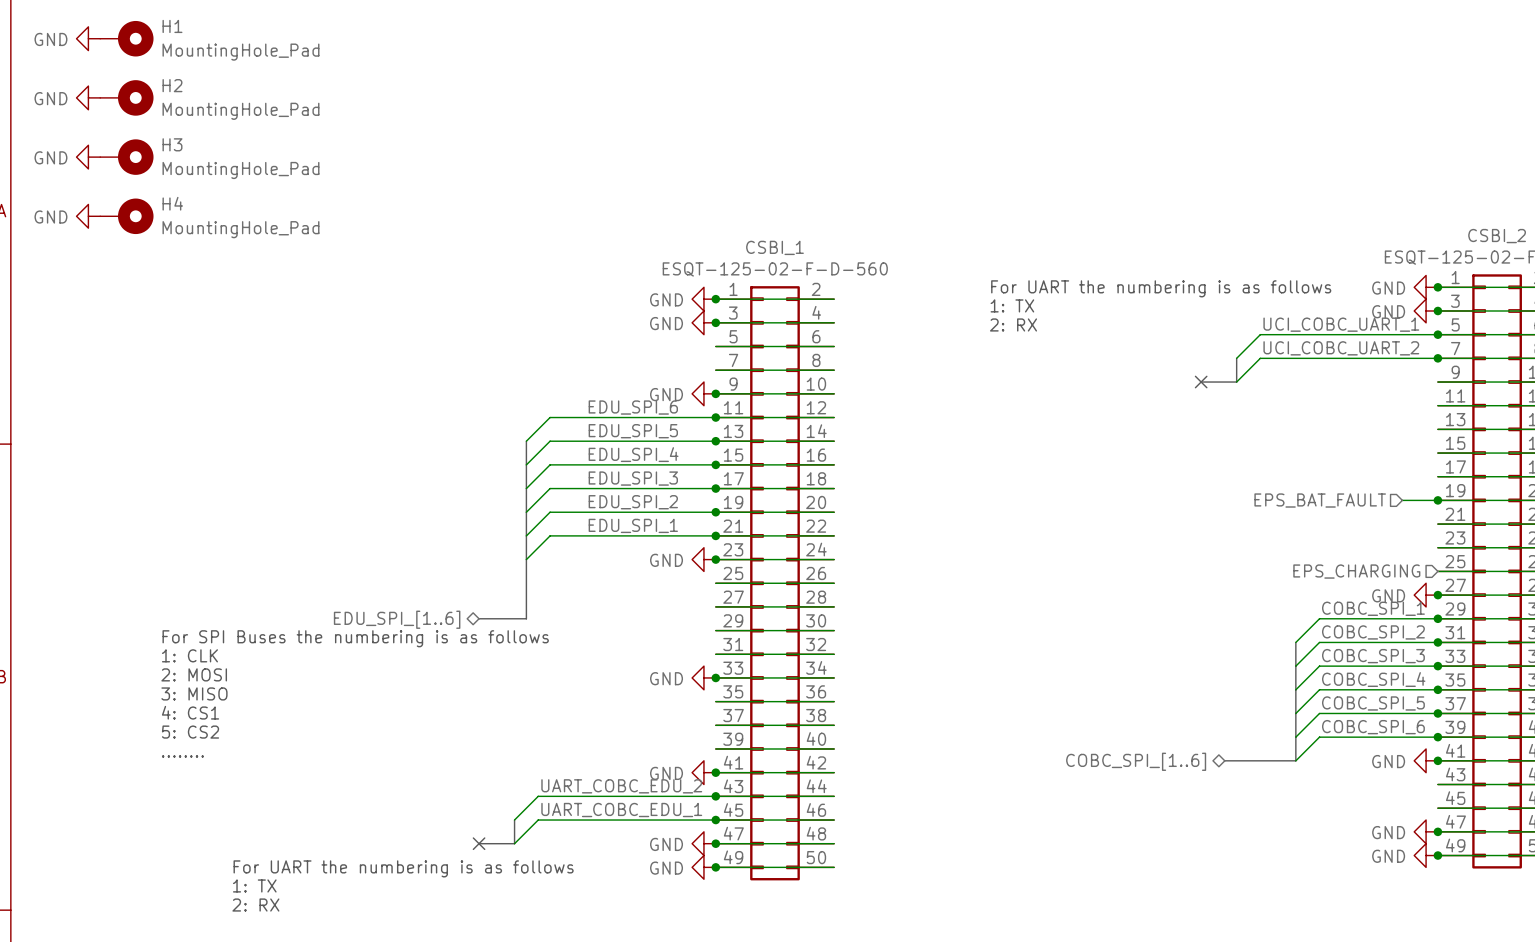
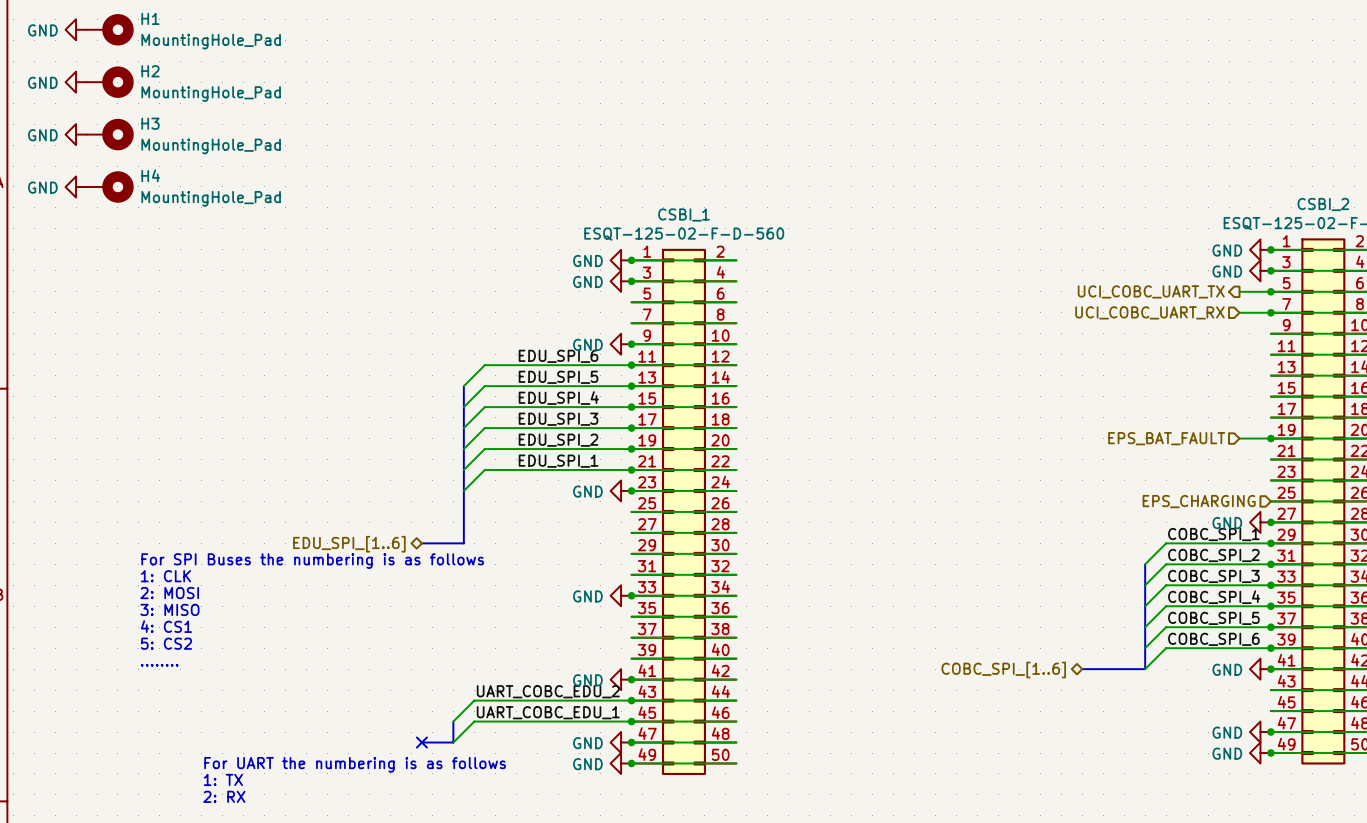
text: For UART the numbering is as follows (1161, 288) -> none
text: 1: TX (1012, 305) -> none
text: 2: RX (1013, 324) -> none
label: UCI_COBC_UART_1 (1341, 324) -> none
hierarchical label: none -> UCI_COBC_UART_TX (1151, 291)
wire: (1402, 334) (1260, 334) (1236, 358) -> none
label: UCI_COBC_UART_2 (1341, 348) -> none
bus: (1236, 358) (1236, 382) (1201, 382) -> none
hierarchical label: none -> UCI_COBC_UART_RX (1149, 312)
wire: (1402, 358) (1260, 358) (1236, 382) -> none
no-connect mark: (1201, 382) -> none

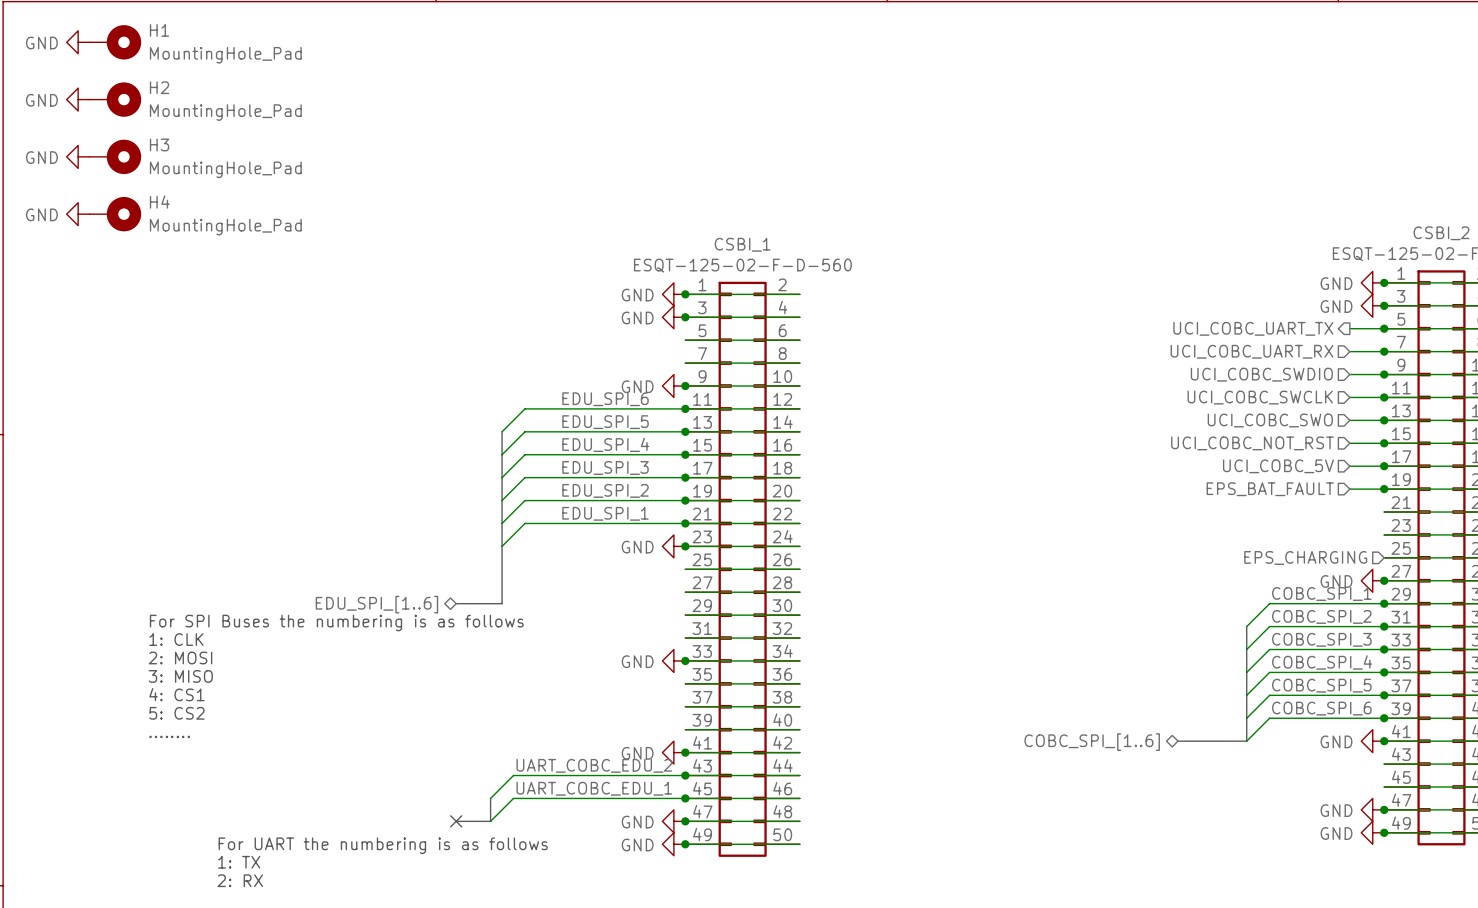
hierarchical label: none -> UCI_COBC_SWDIO (1261, 374)
wire: none -> (1349, 374) (1384, 374)
junction: none -> (1384, 374)
hierarchical label: none -> UCI_COBC_SWCLK (1260, 397)
wire: none -> (1349, 397) (1384, 397)
junction: none -> (1384, 397)
hierarchical label: none -> UCI_COBC_SWO (1270, 420)
wire: none -> (1349, 420) (1384, 420)
junction: none -> (1384, 420)
hierarchical label: none -> UCI_COBC_NOT_RST (1252, 443)
wire: none -> (1349, 443) (1384, 443)
junction: none -> (1384, 443)
hierarchical label: none -> UCI_COBC_5V (1278, 466)
wire: none -> (1349, 466) (1384, 466)
junction: none -> (1384, 466)

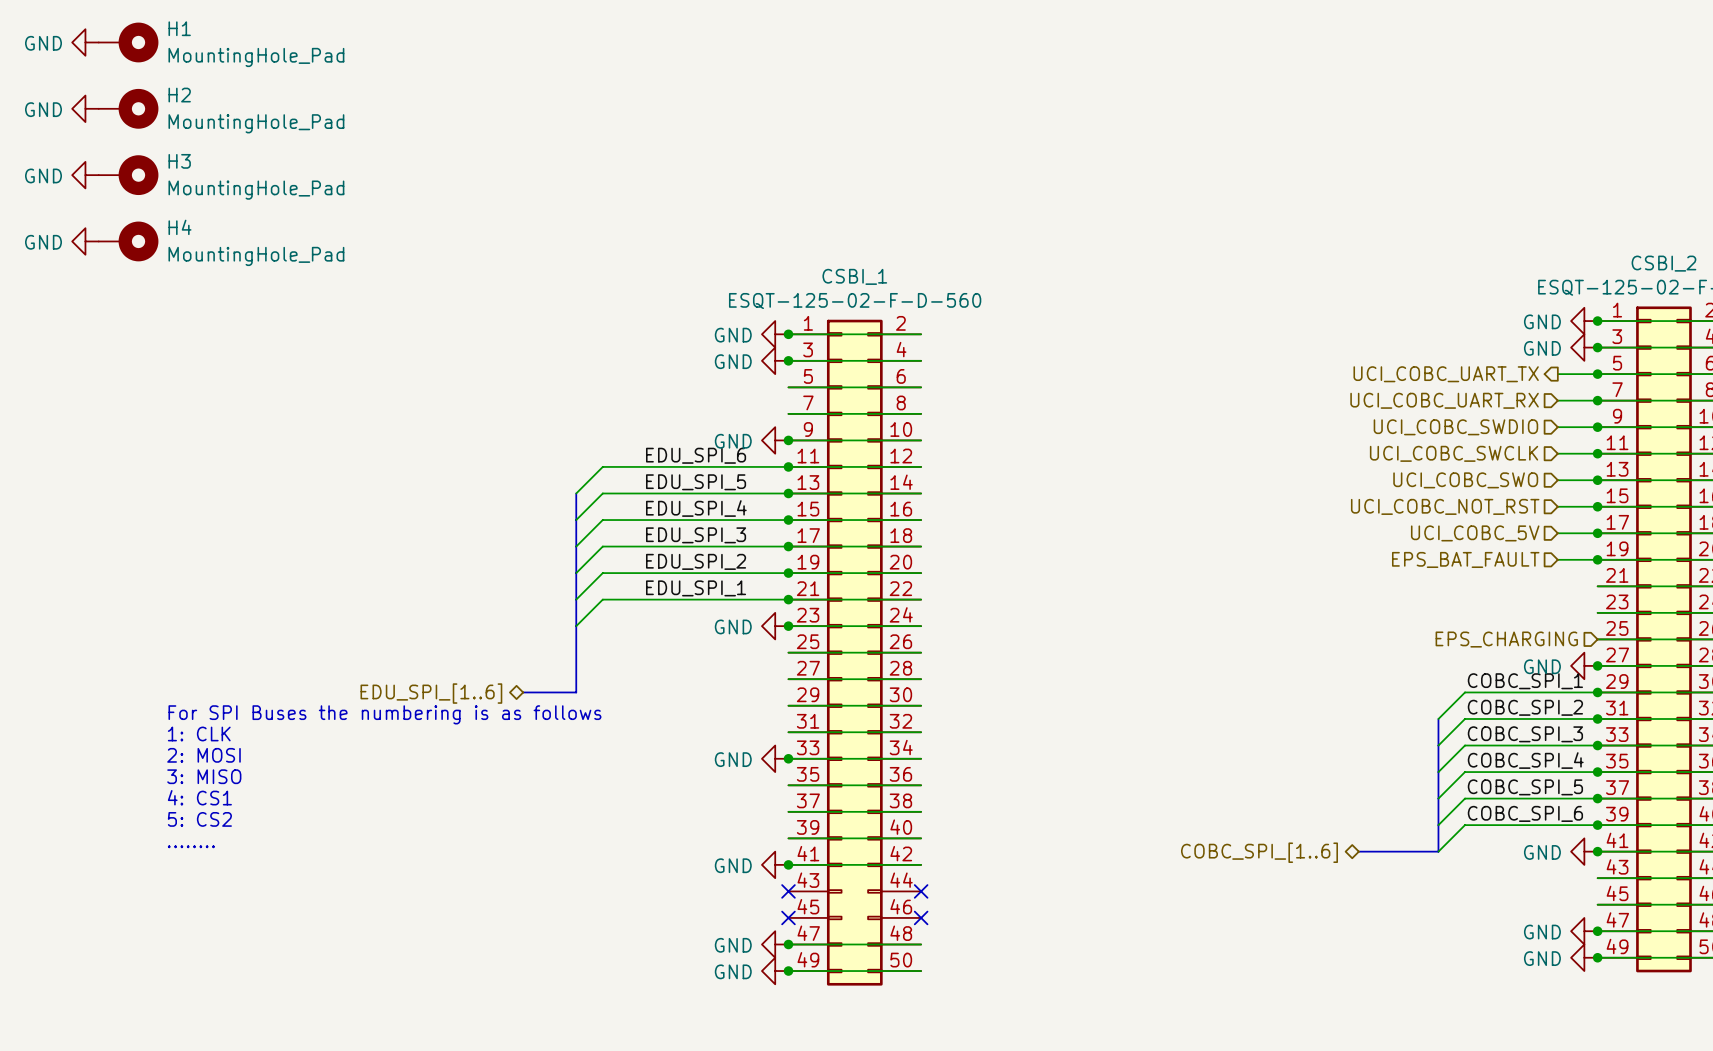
label: UART_COBC_EDU_2 (594, 765) -> none
junction: (685, 775) -> none
no-connect mark: none -> (788, 891)
wire: (799, 775) (513, 775) (490, 798) -> none
no-connect mark: none -> (921, 891)
label: UART_COBC_EDU_1 (594, 788) -> none
bus: (490, 798) (490, 821) (456, 821) -> none
junction: (685, 798) -> none
no-connect mark: none -> (788, 917)
wire: (799, 798) (513, 798) (490, 821) -> none
no-connect mark: none -> (921, 917)
no-connect mark: (456, 821) -> none
text: For UART the numbering is as follows (383, 845) -> none
text: 1: TX (239, 862) -> none
text: 2: RX (240, 880) -> none

